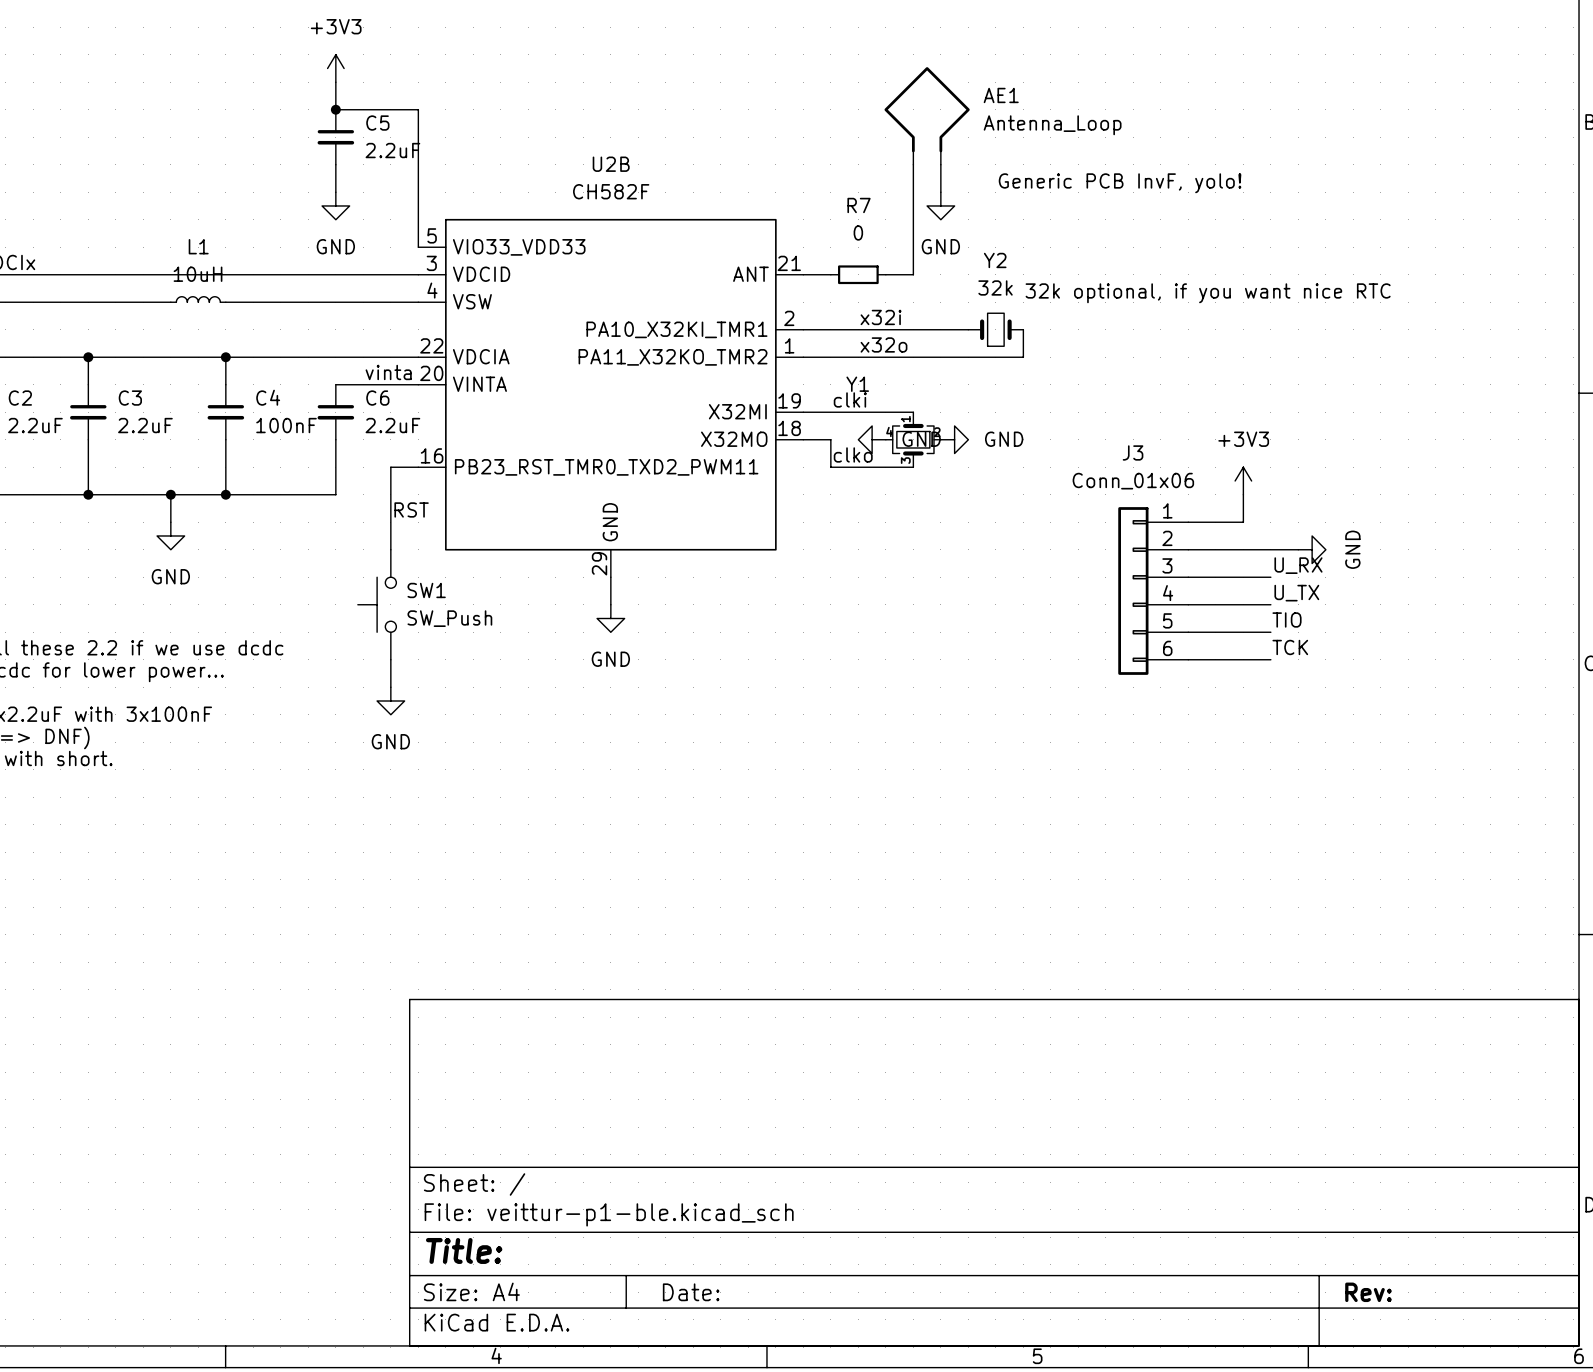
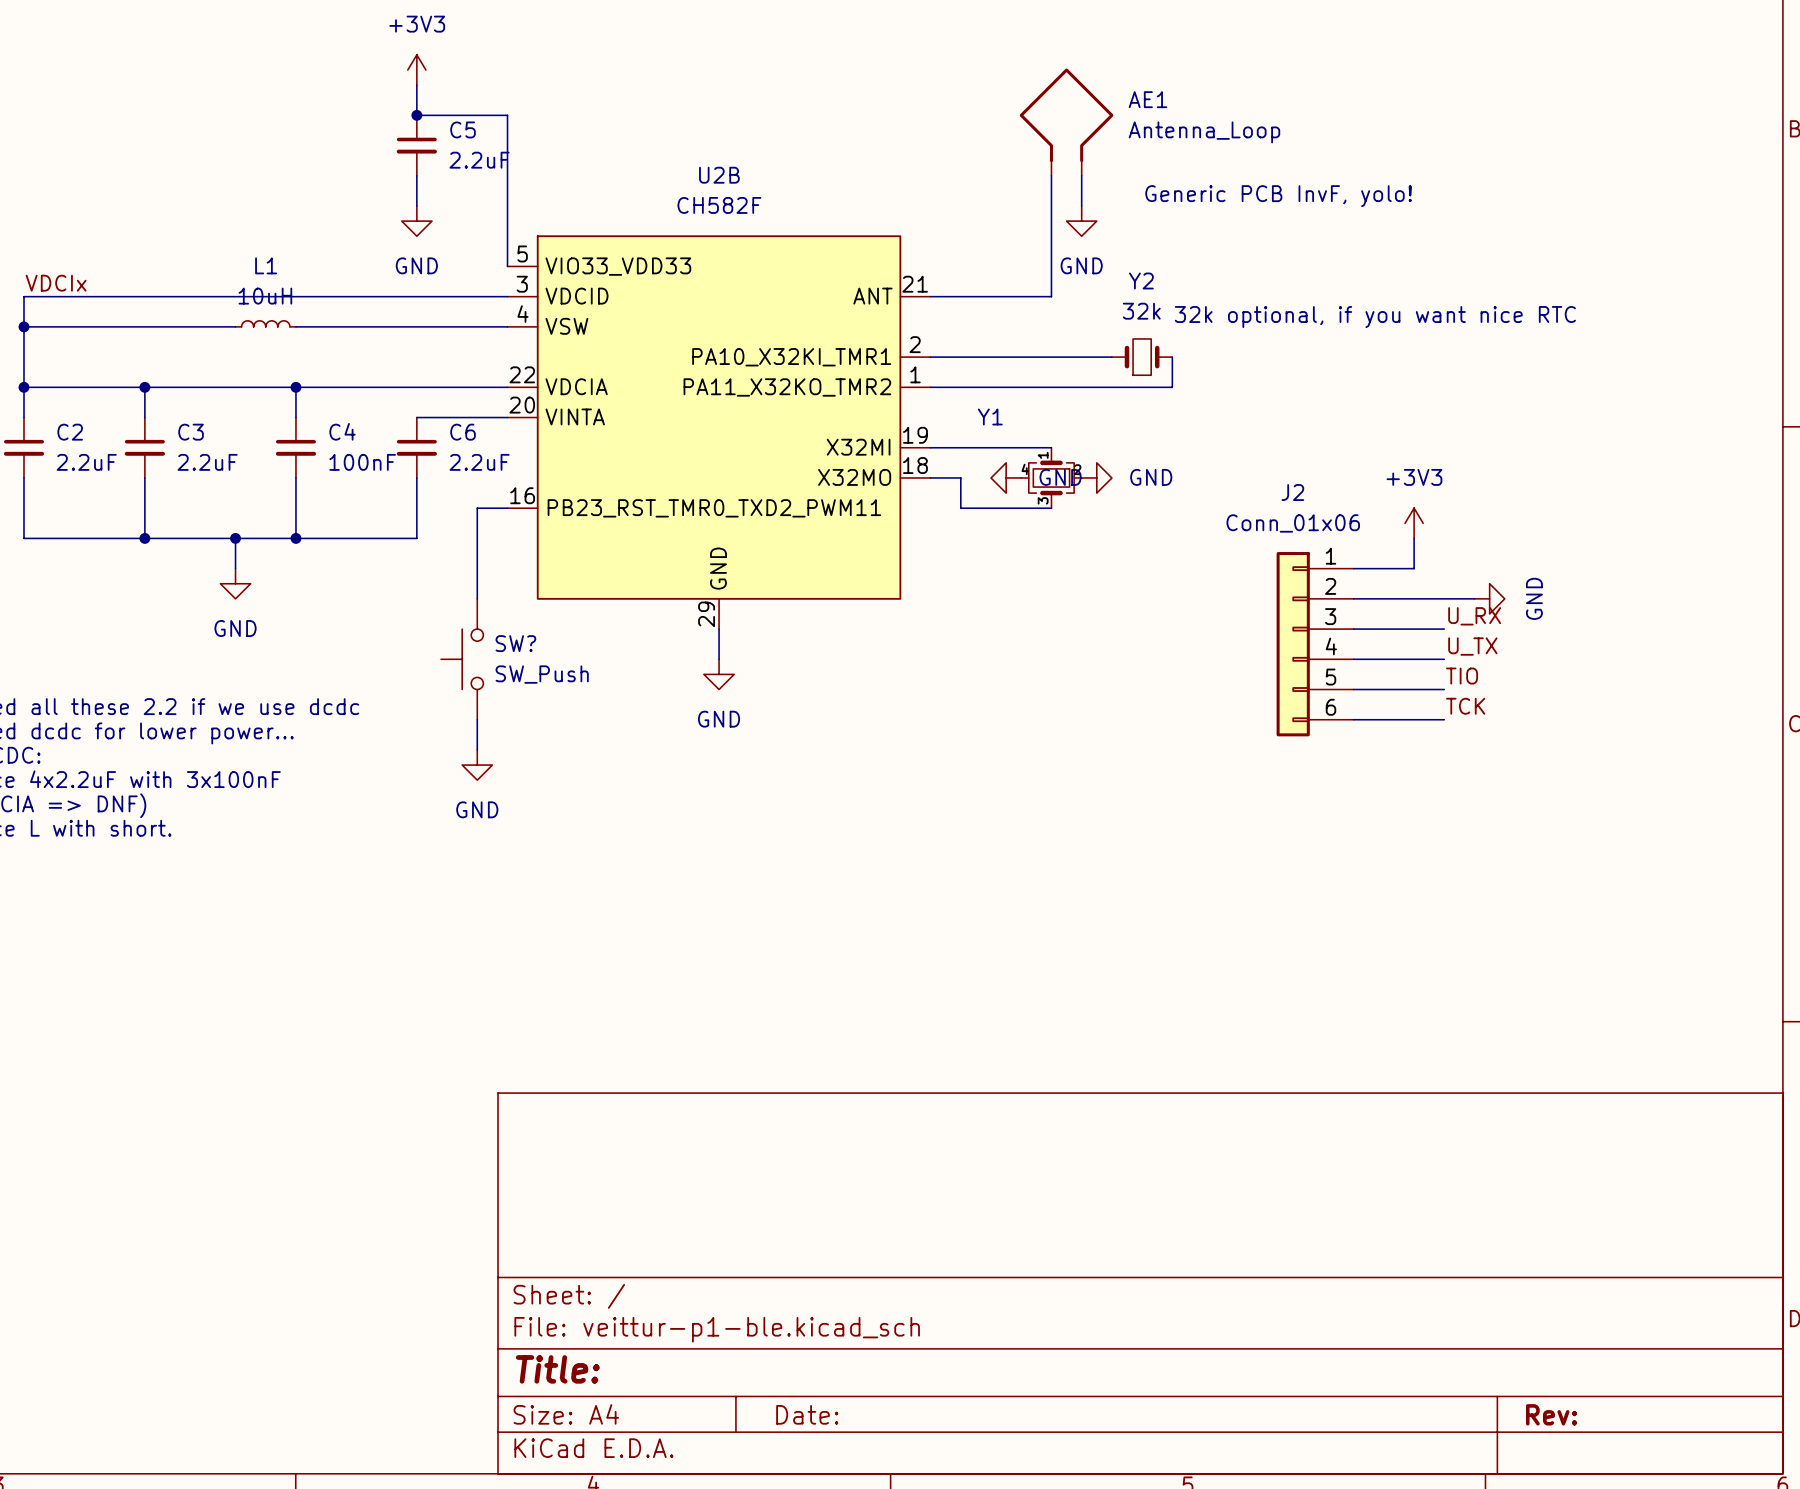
wire: none -> (960, 296) (1021, 296)
R7: 0 (858, 274) -> none
label: x32i (881, 317) -> none
label: x32o (884, 344) -> none
label: vinta (388, 372) -> none
label: clki (850, 399) -> none
J3 name: J3 (1133, 452) -> J2 (1292, 492)
label: clko (853, 454) -> none
label: RST (411, 509) -> none
SW1 name: SW1 (426, 590) -> SW? (515, 643)

